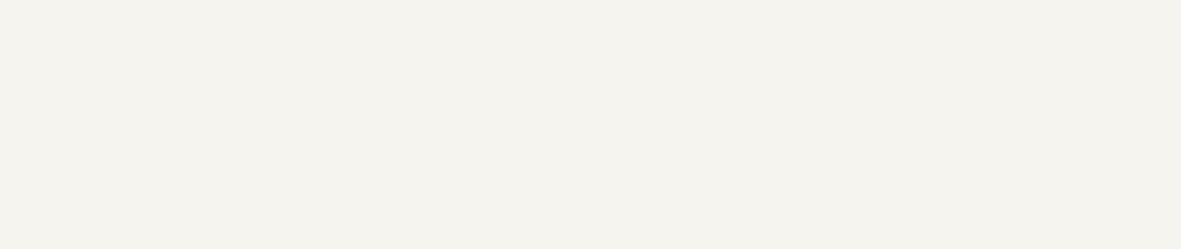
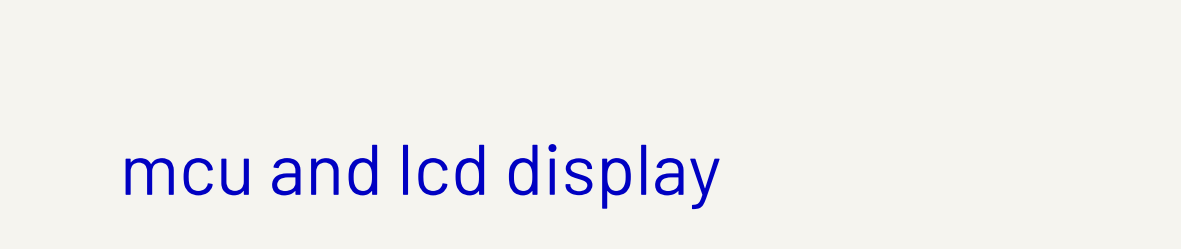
text: none -> mcu and lcd display (422, 176)

